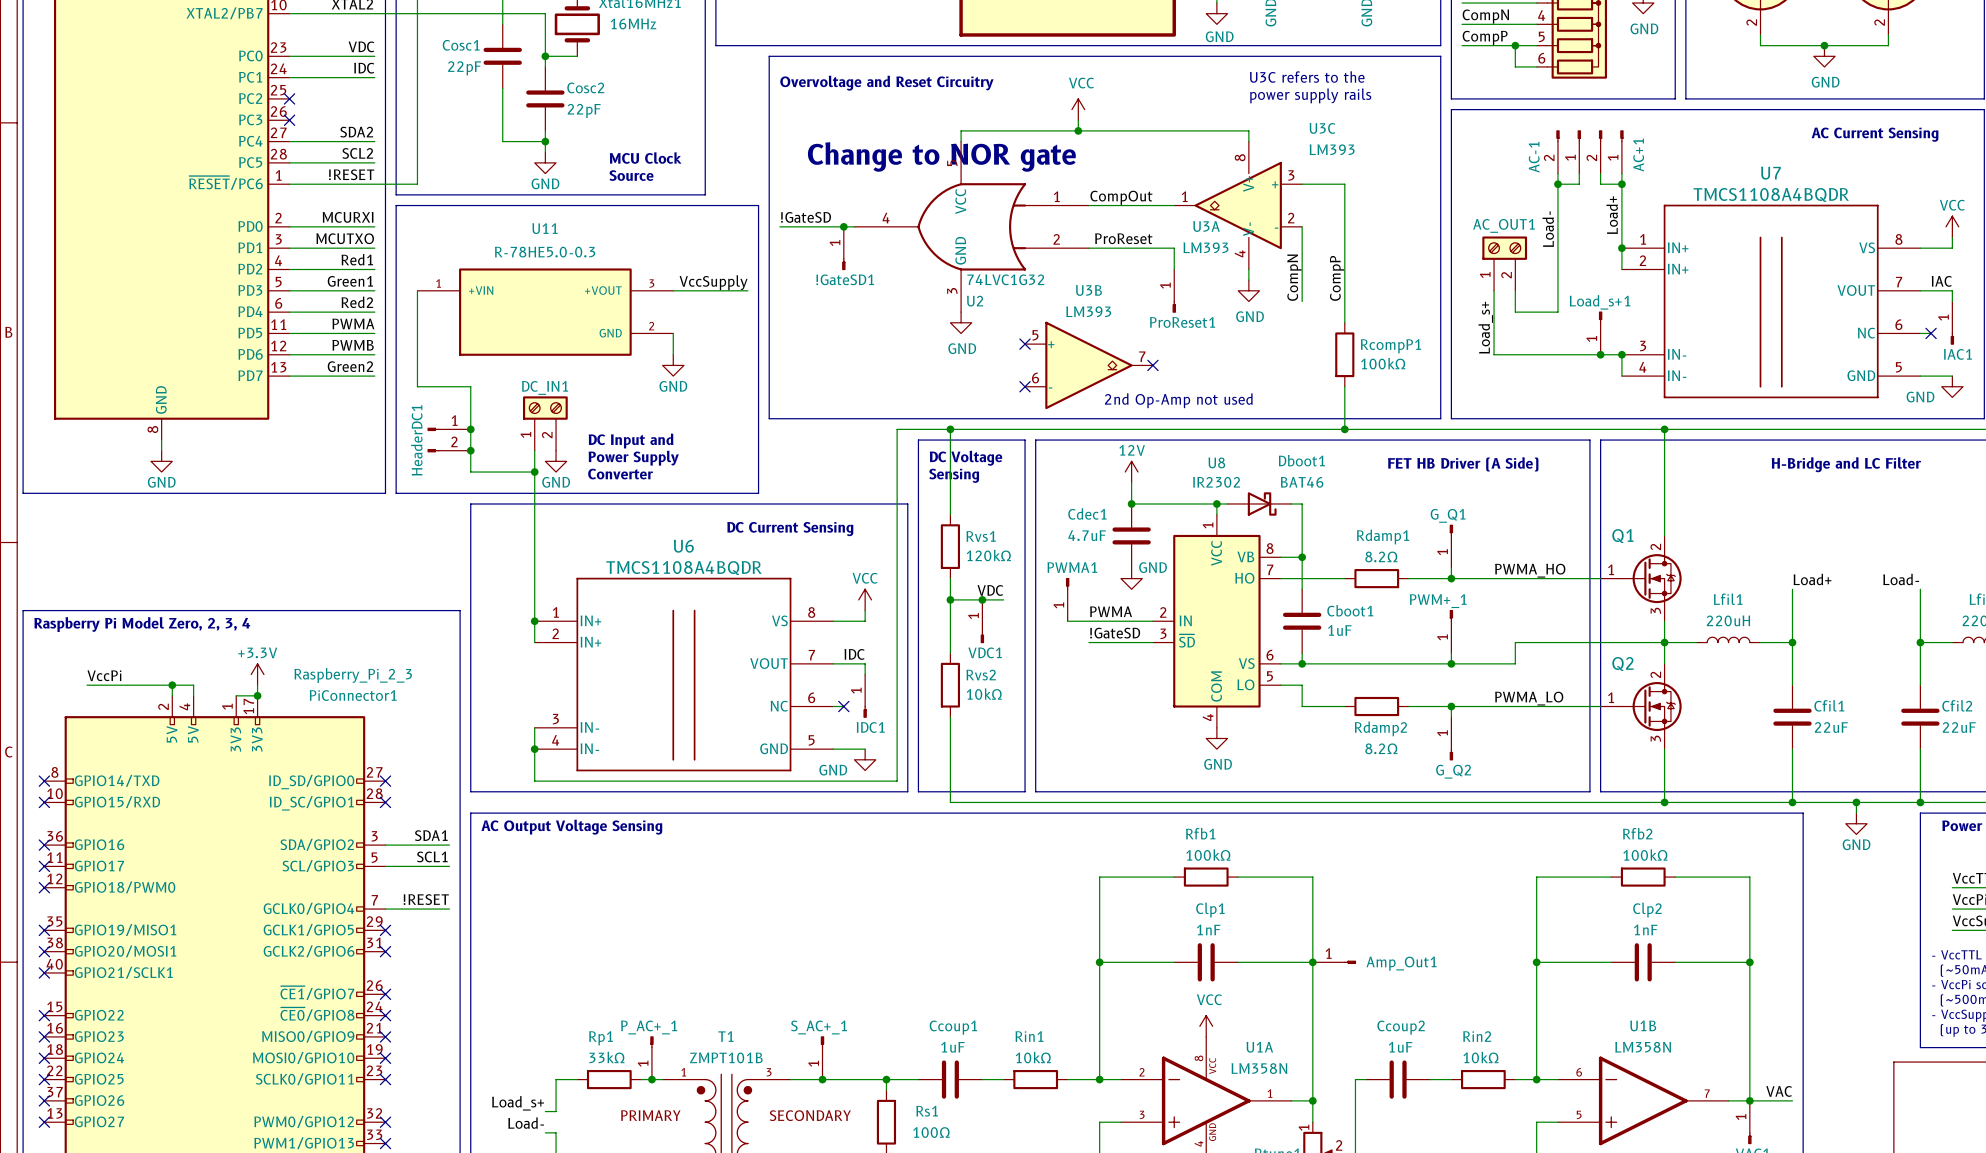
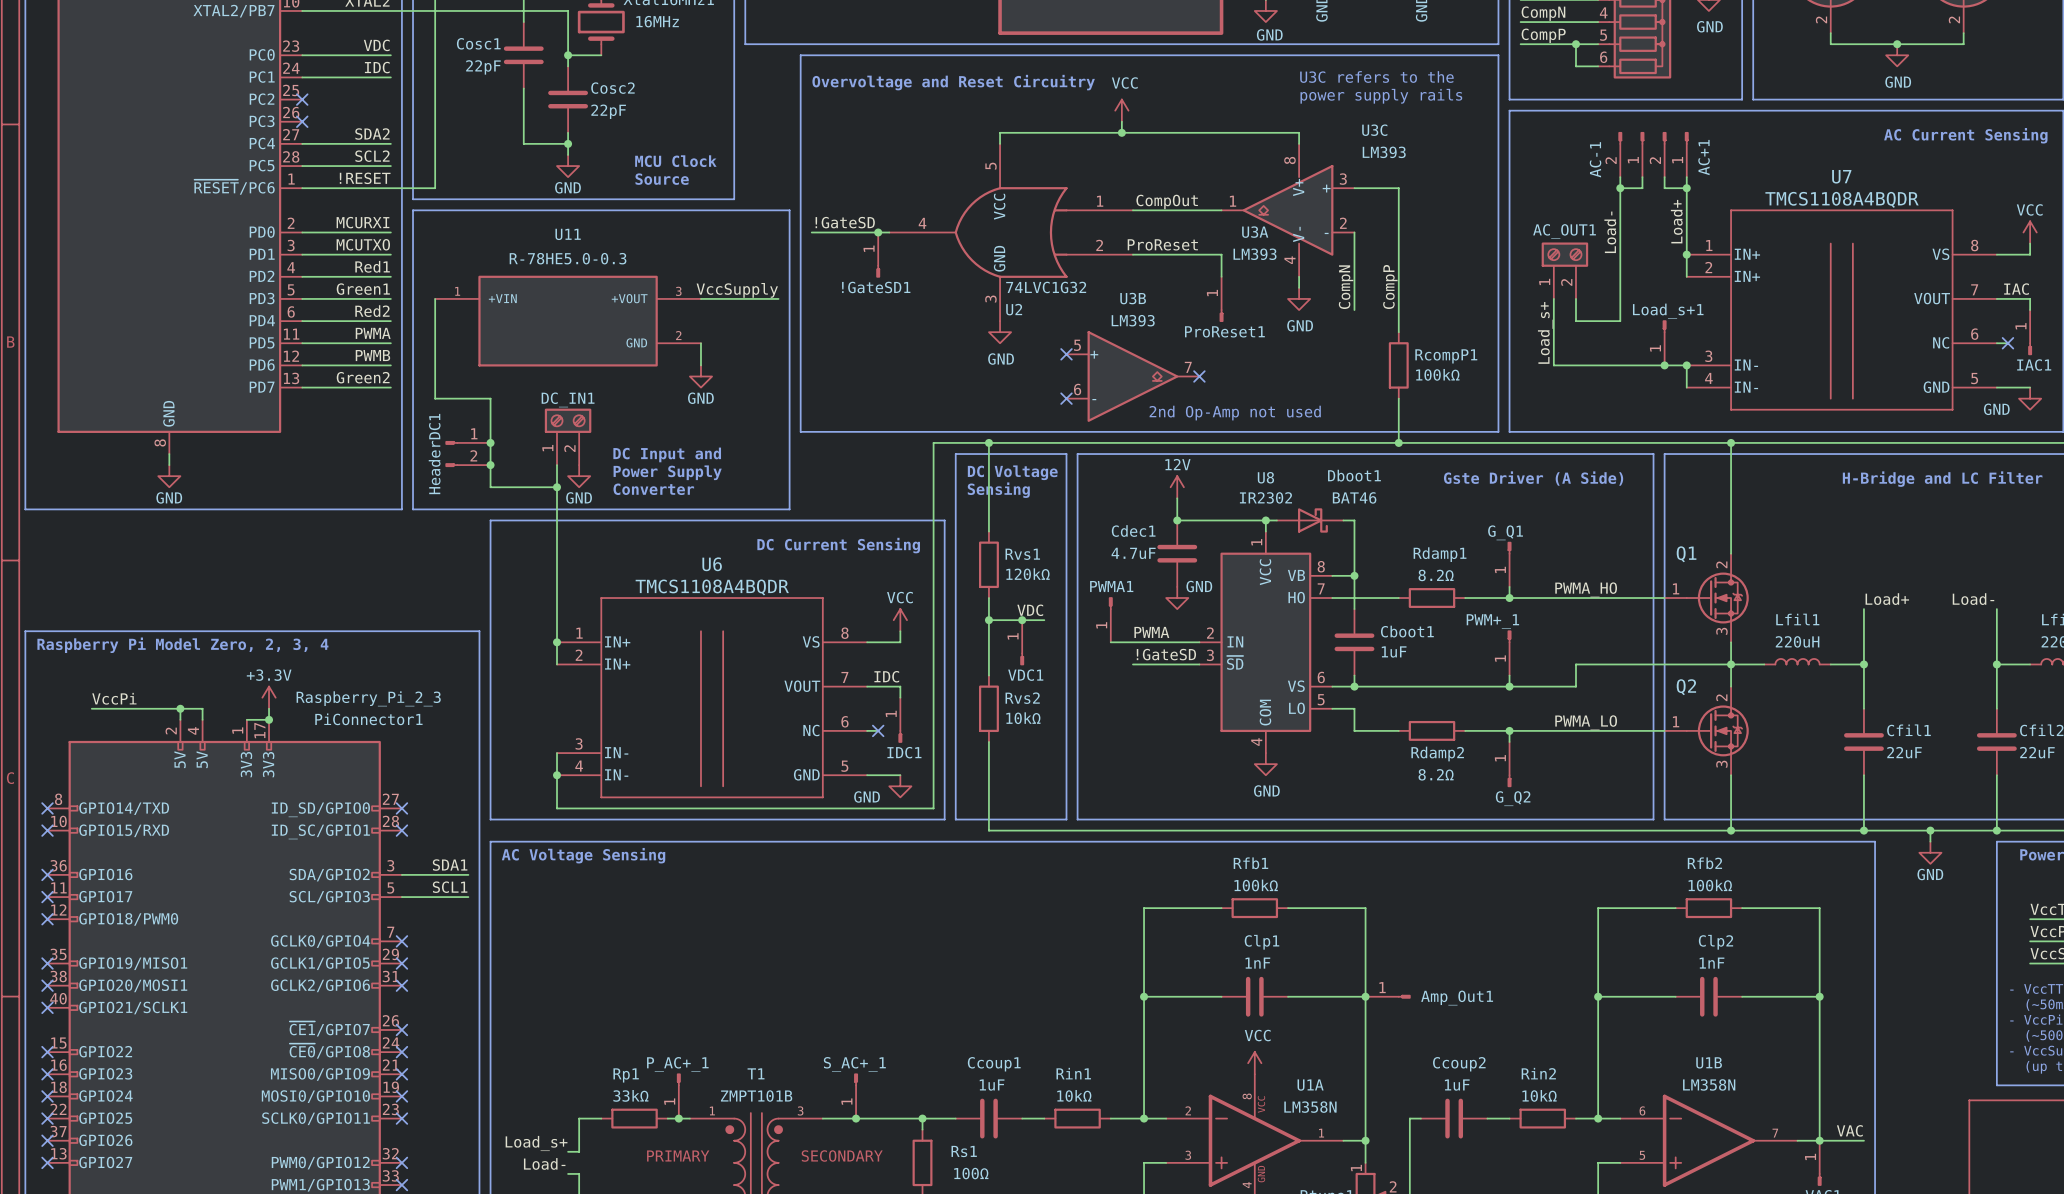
text: Change to NOR gate (941, 156) -> none
text: FET HB Driver (A Side) (1463, 464) -> Gste Driver (A Side) (1533, 478)
text: AC Output Voltage Sensing (571, 827) -> AC Voltage Sensing (583, 855)
label: !RESET (426, 899) -> none
wire: (385, 909) (449, 909) -> none
no-connect mark: none -> (401, 941)

